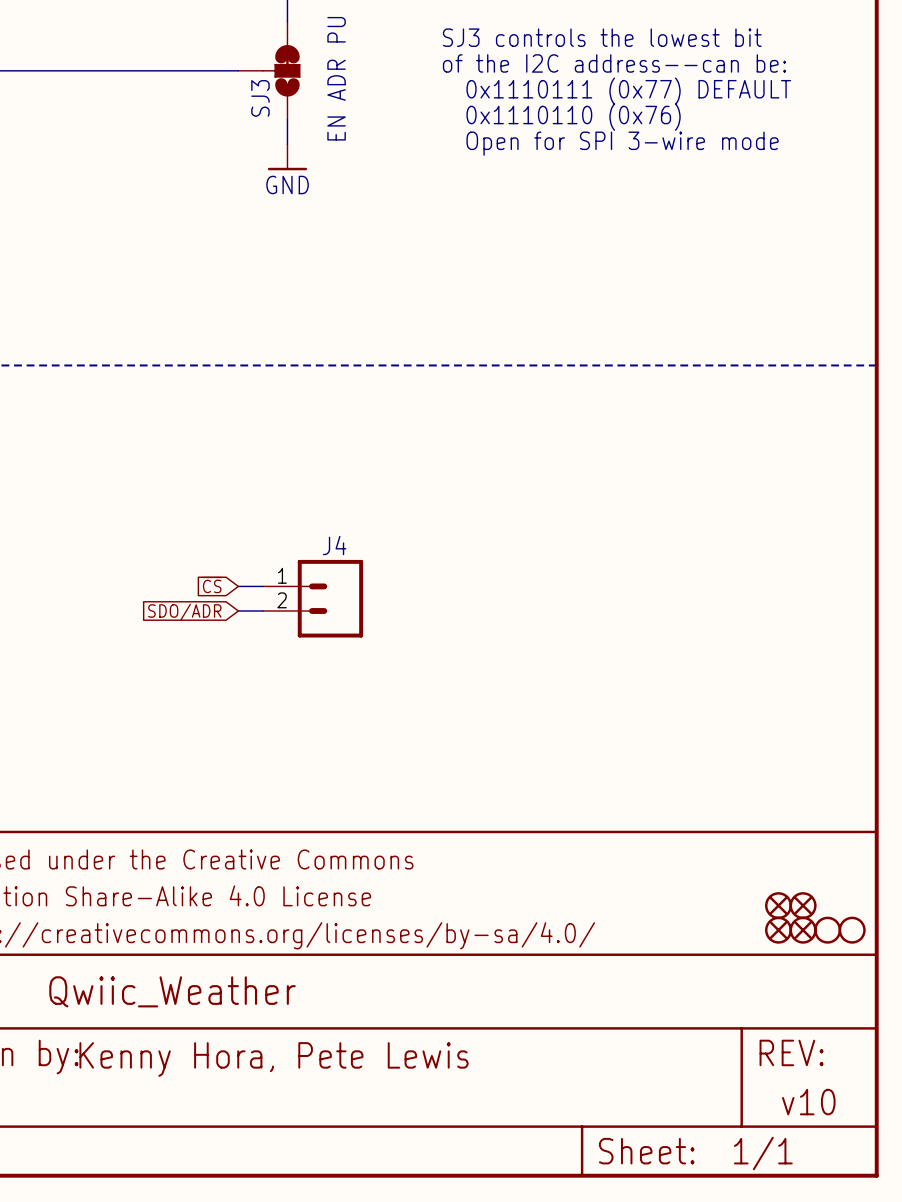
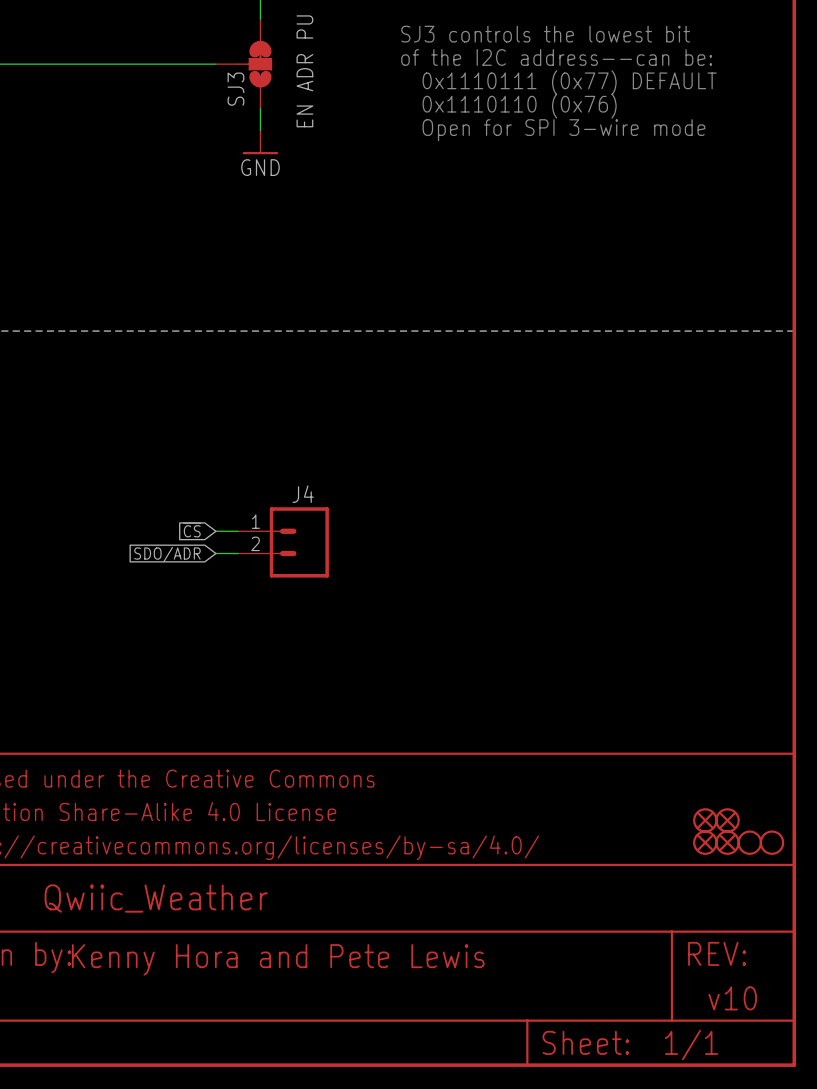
text: Kenny Hora, Pete Lewis (274, 1059) -> Kenny Hora and Pete Lewis (278, 959)

